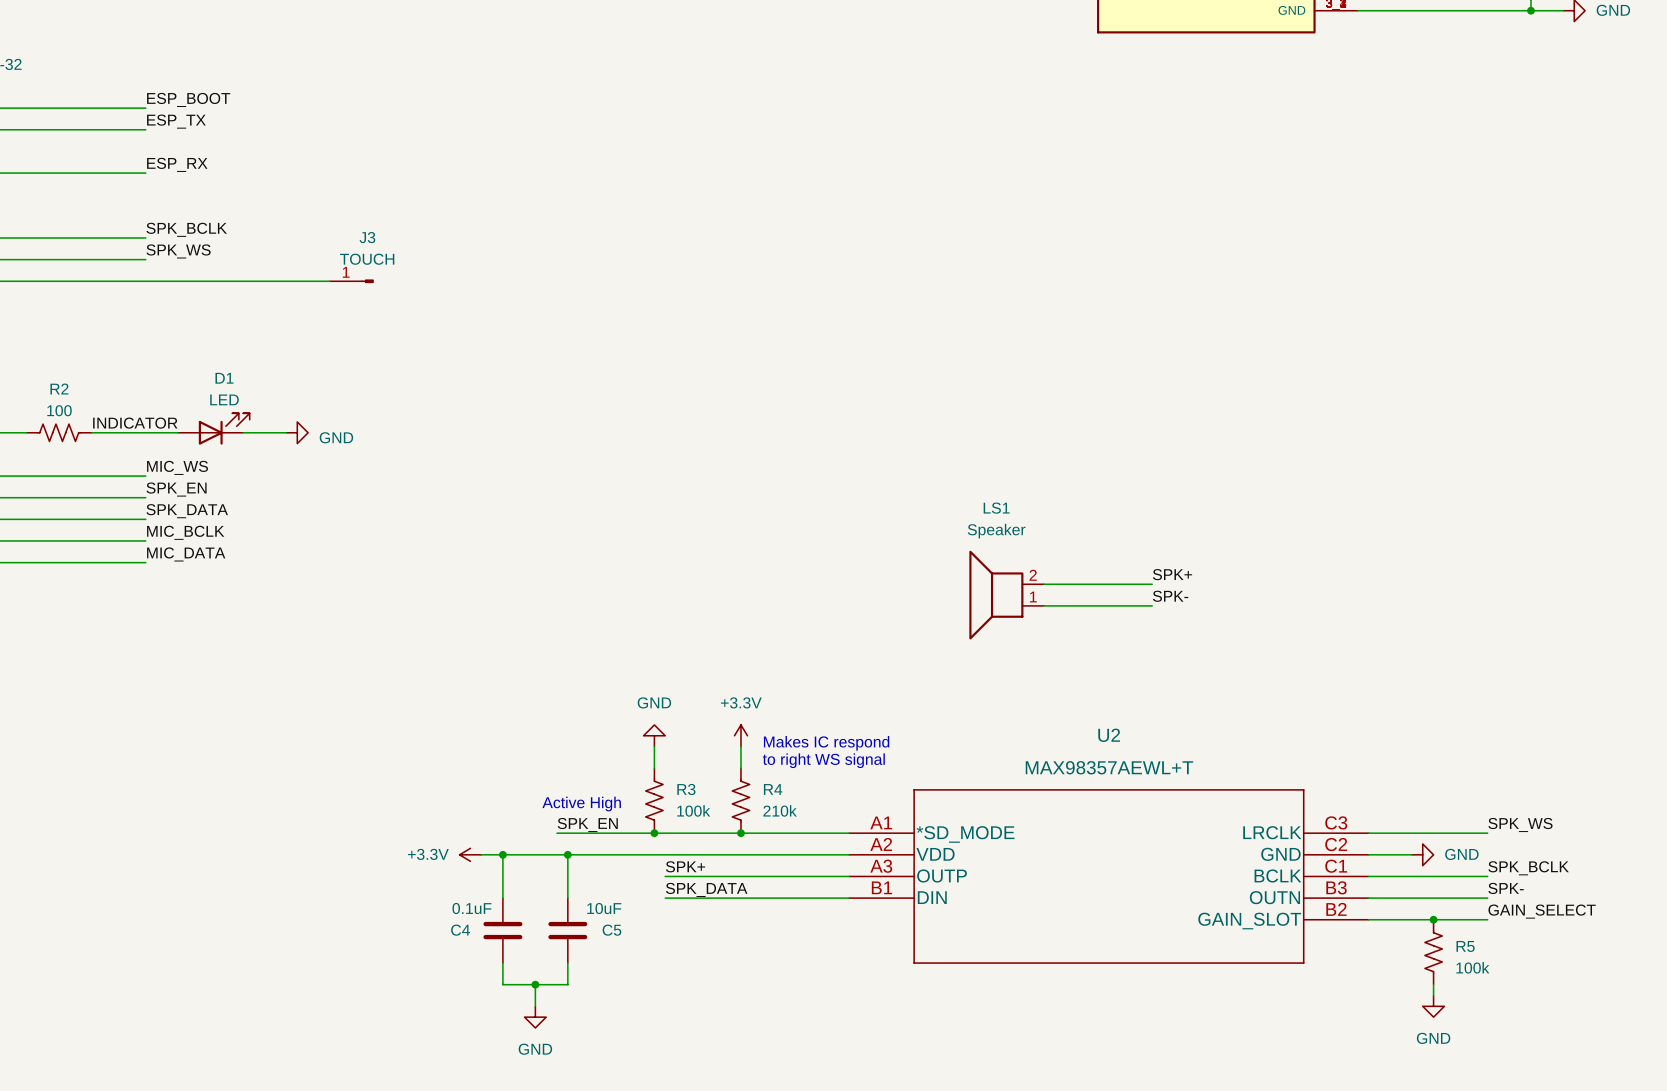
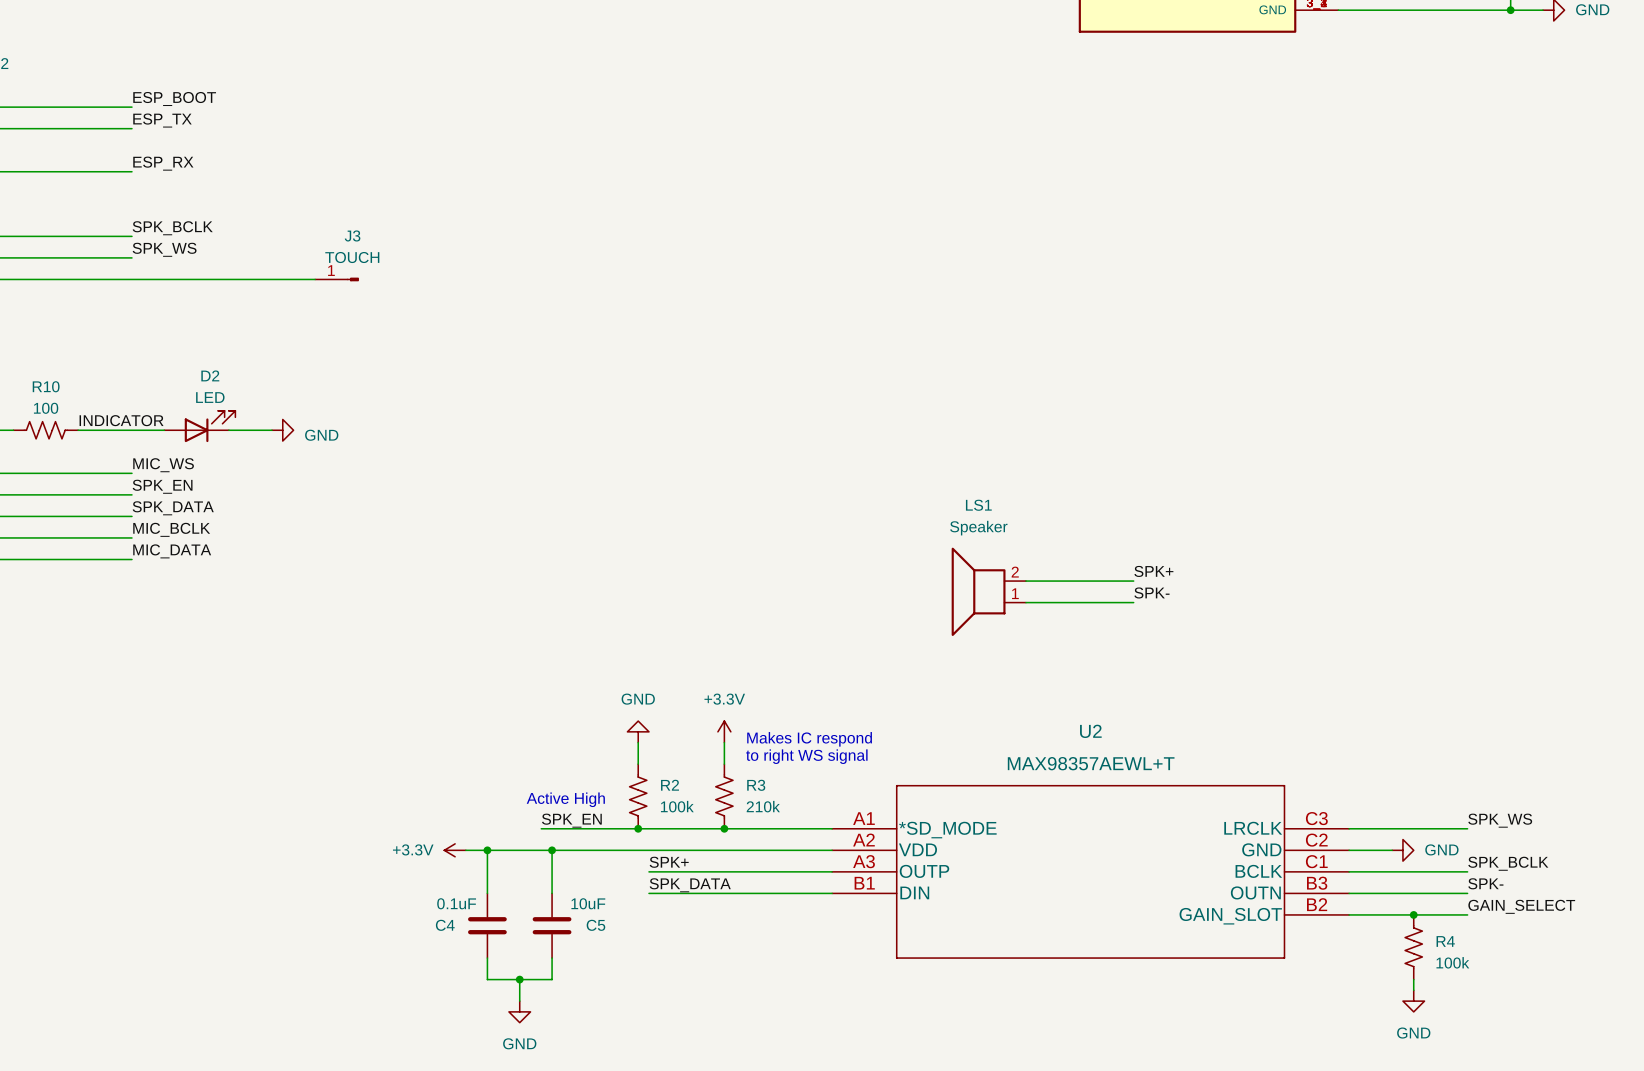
D1 name: D1 (224, 378) -> D2 (210, 375)
R2 name: R2 (59, 389) -> R10 (46, 386)
R3 name: R3 (686, 789) -> R2 (670, 785)
R4 name: R4 (773, 789) -> R3 (756, 785)
R5 name: R5 (1465, 946) -> R4 (1445, 941)

